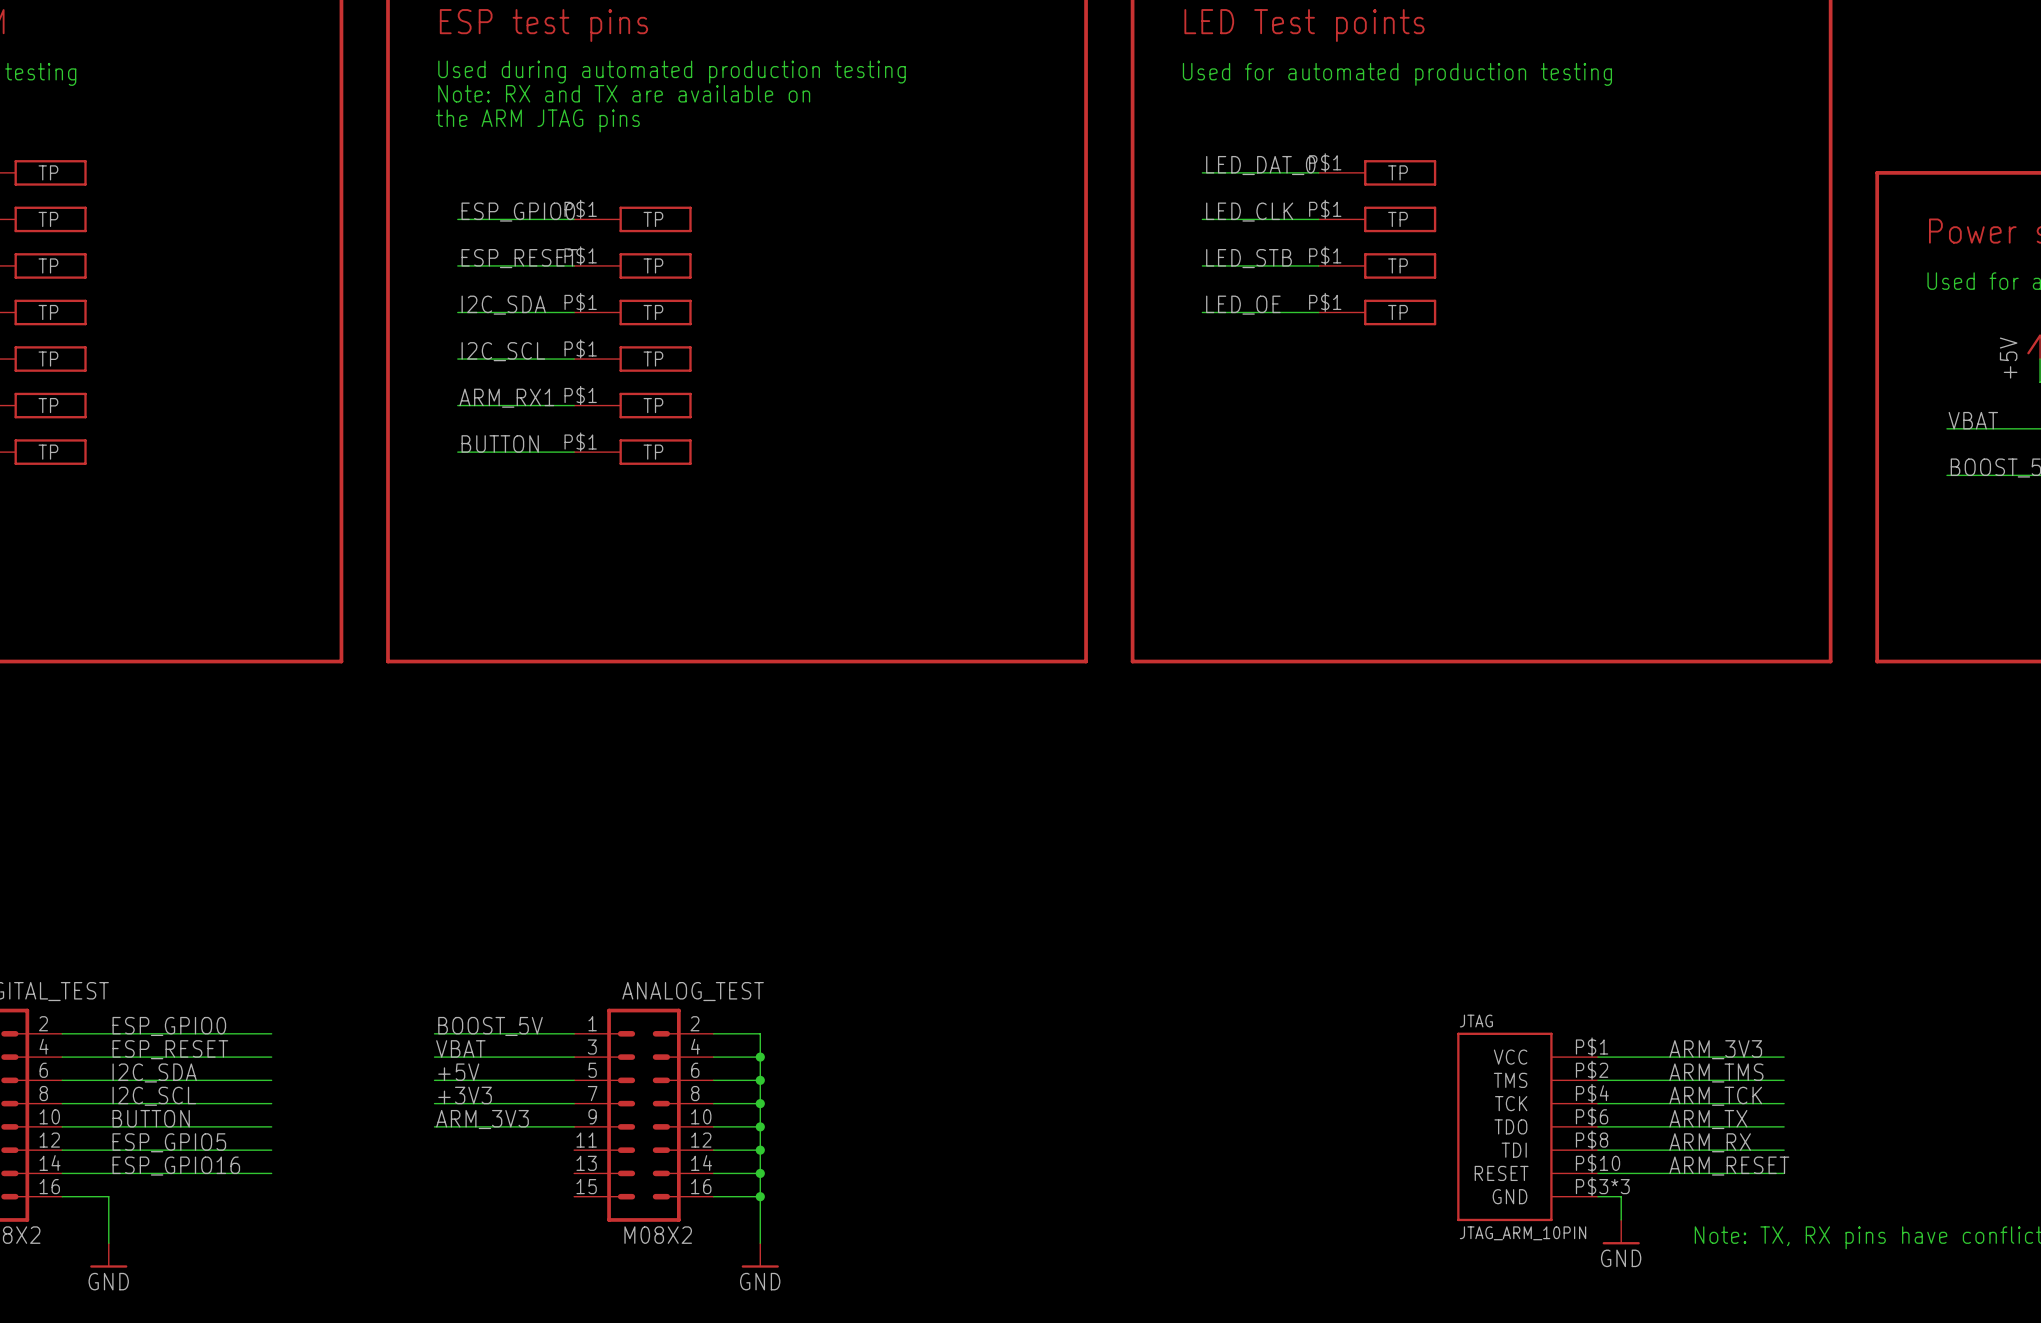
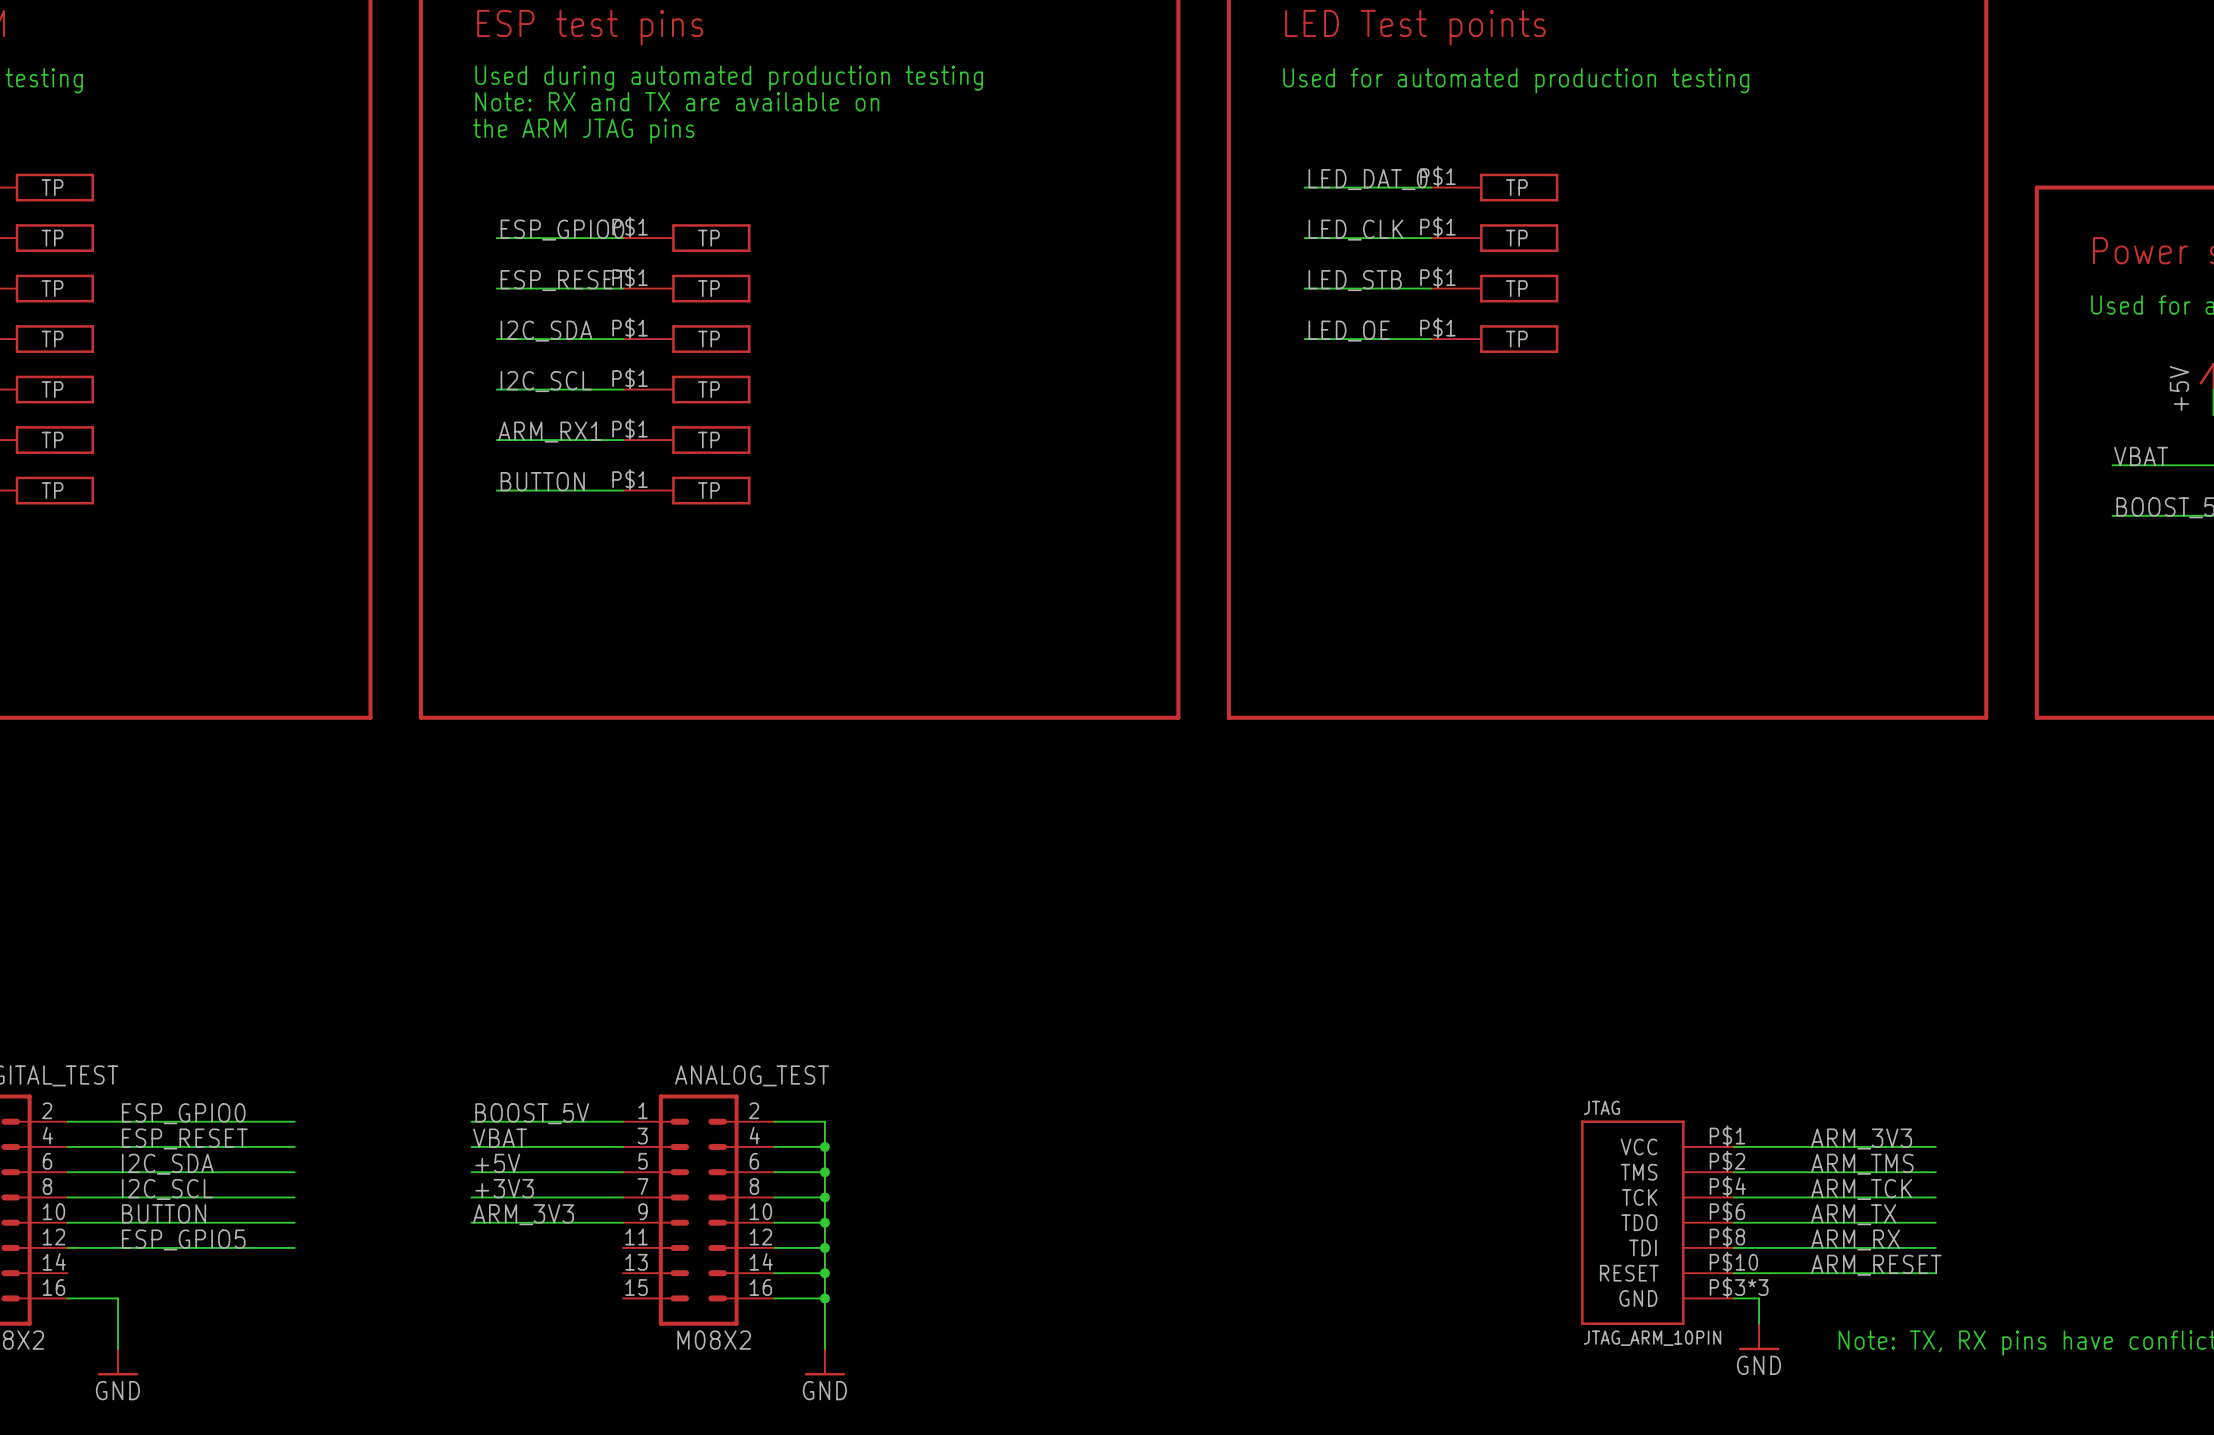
label: ESP_GPIO16 (176, 1166) -> none
wire: (62, 1173) (271, 1173) -> none

